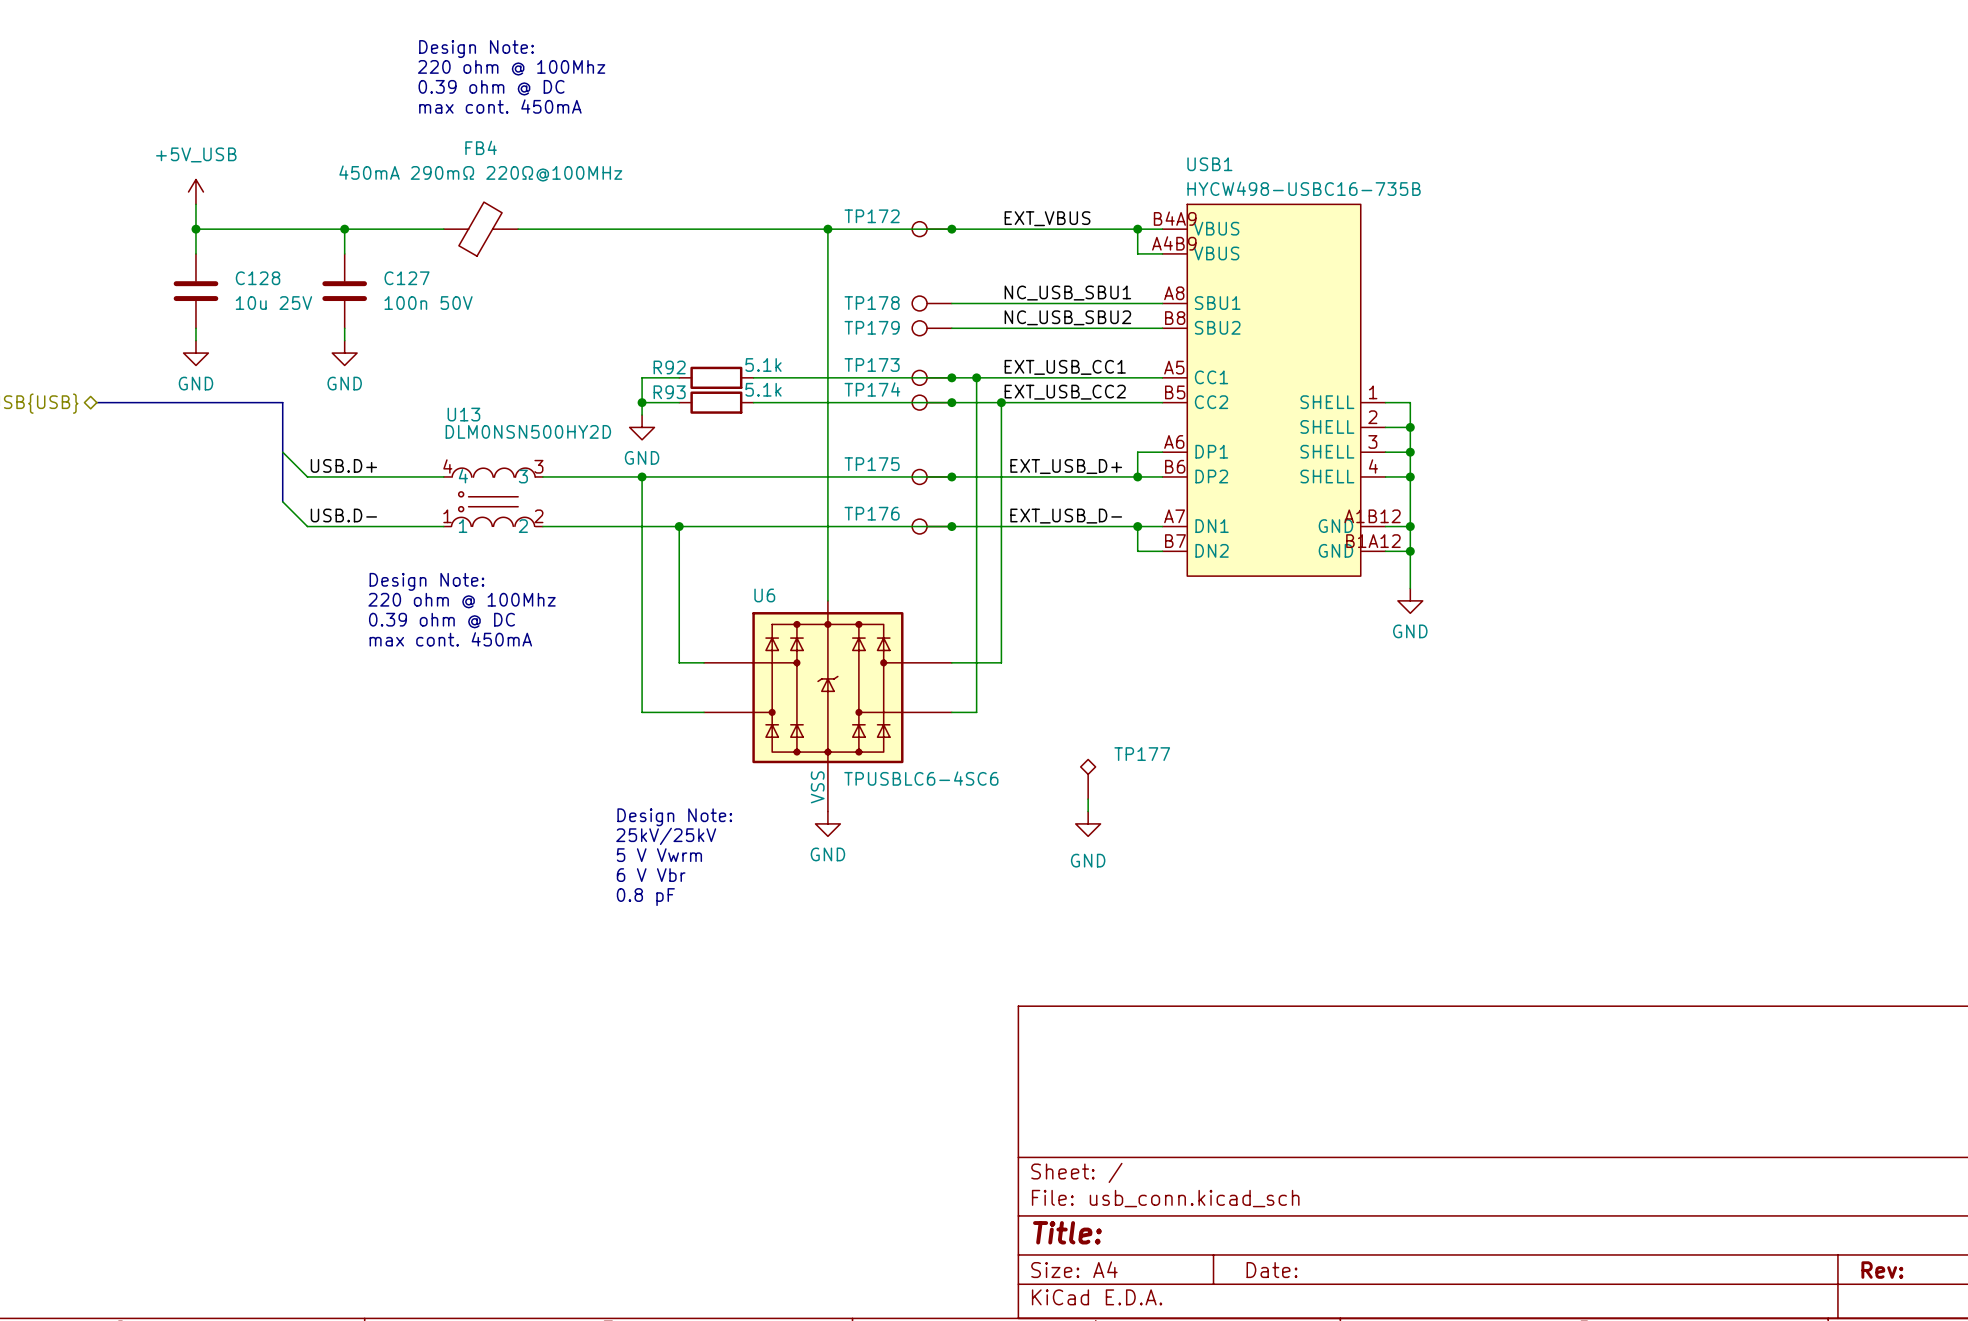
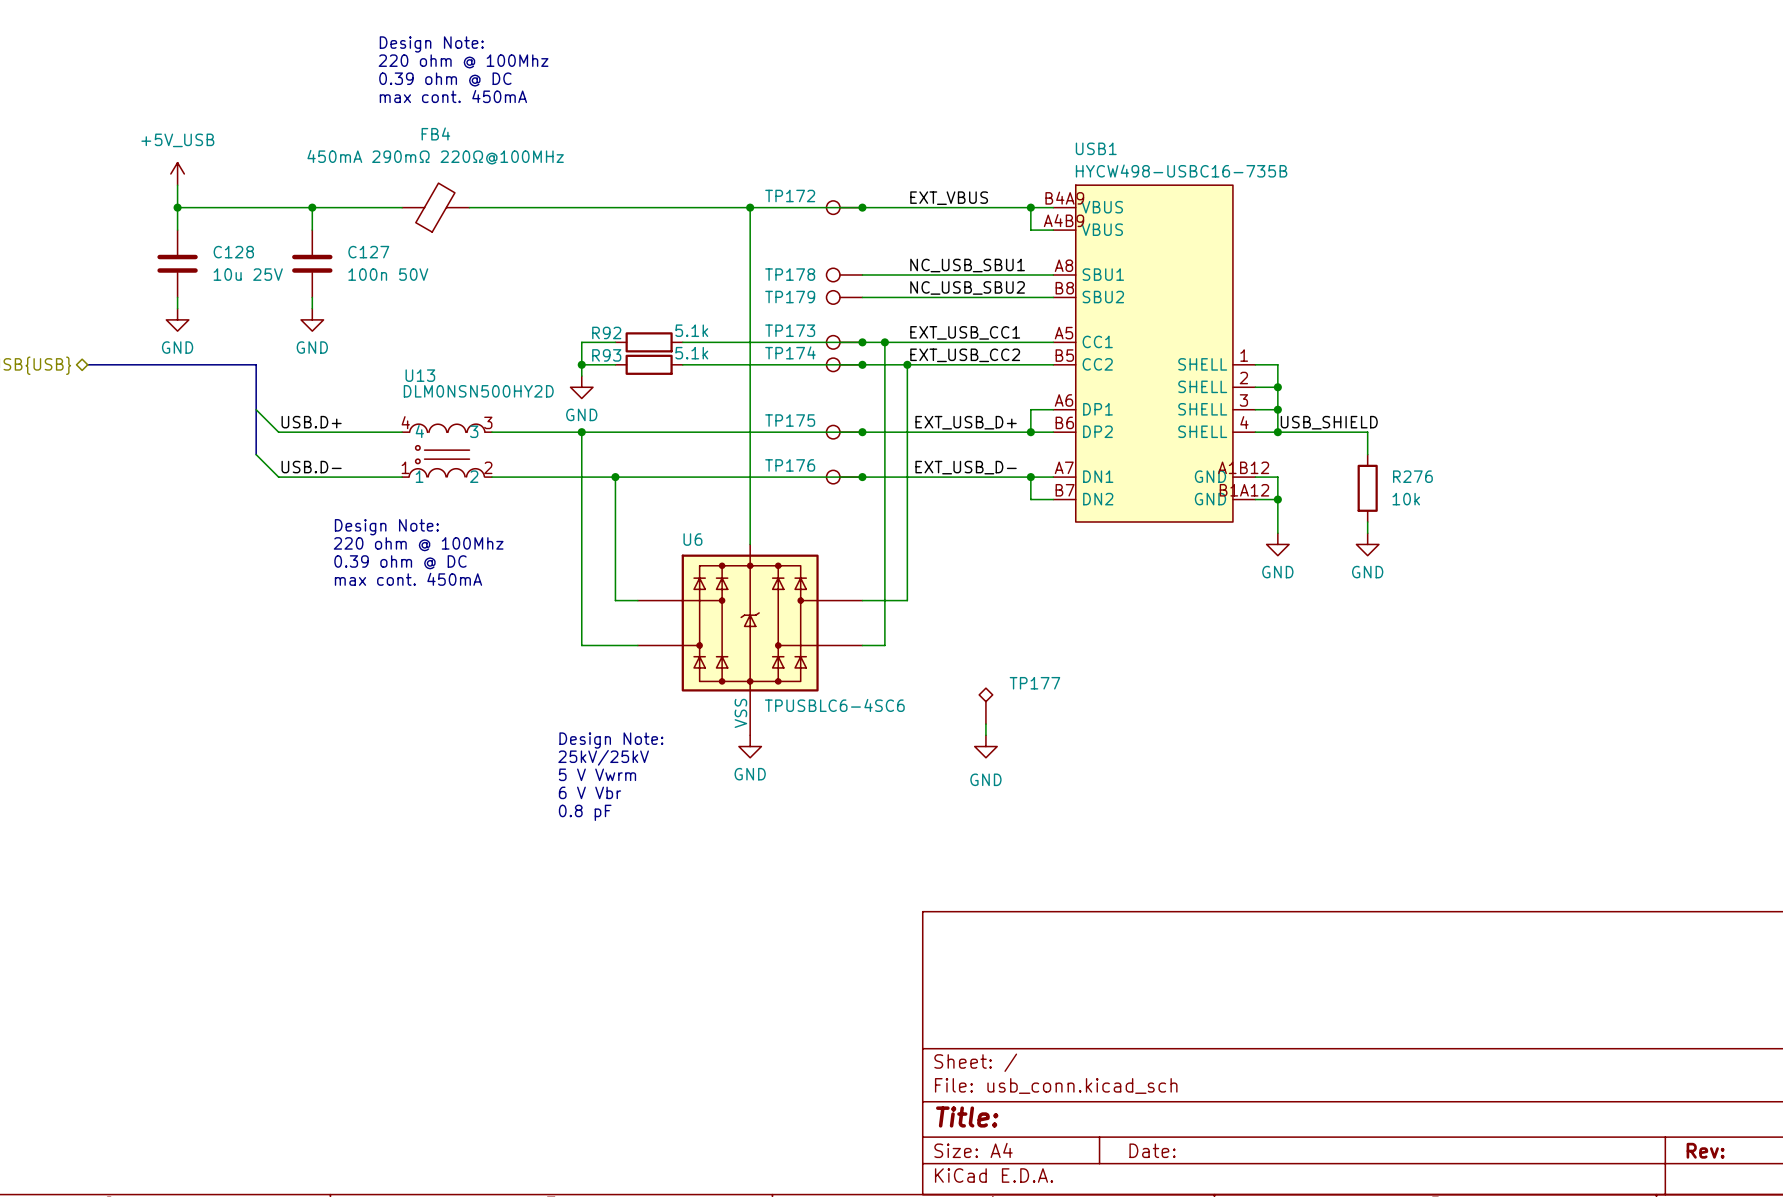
label: none -> USB_SHIELD (1329, 422)
wire: (1410, 476) (1410, 526) -> (1277, 432) (1367, 432) (1367, 454)
junction: (1410, 526) -> none
R276: none -> 10k (1367, 488)
wire: none -> (1367, 521) (1367, 533)
power symbol: none -> GND (1367, 544)

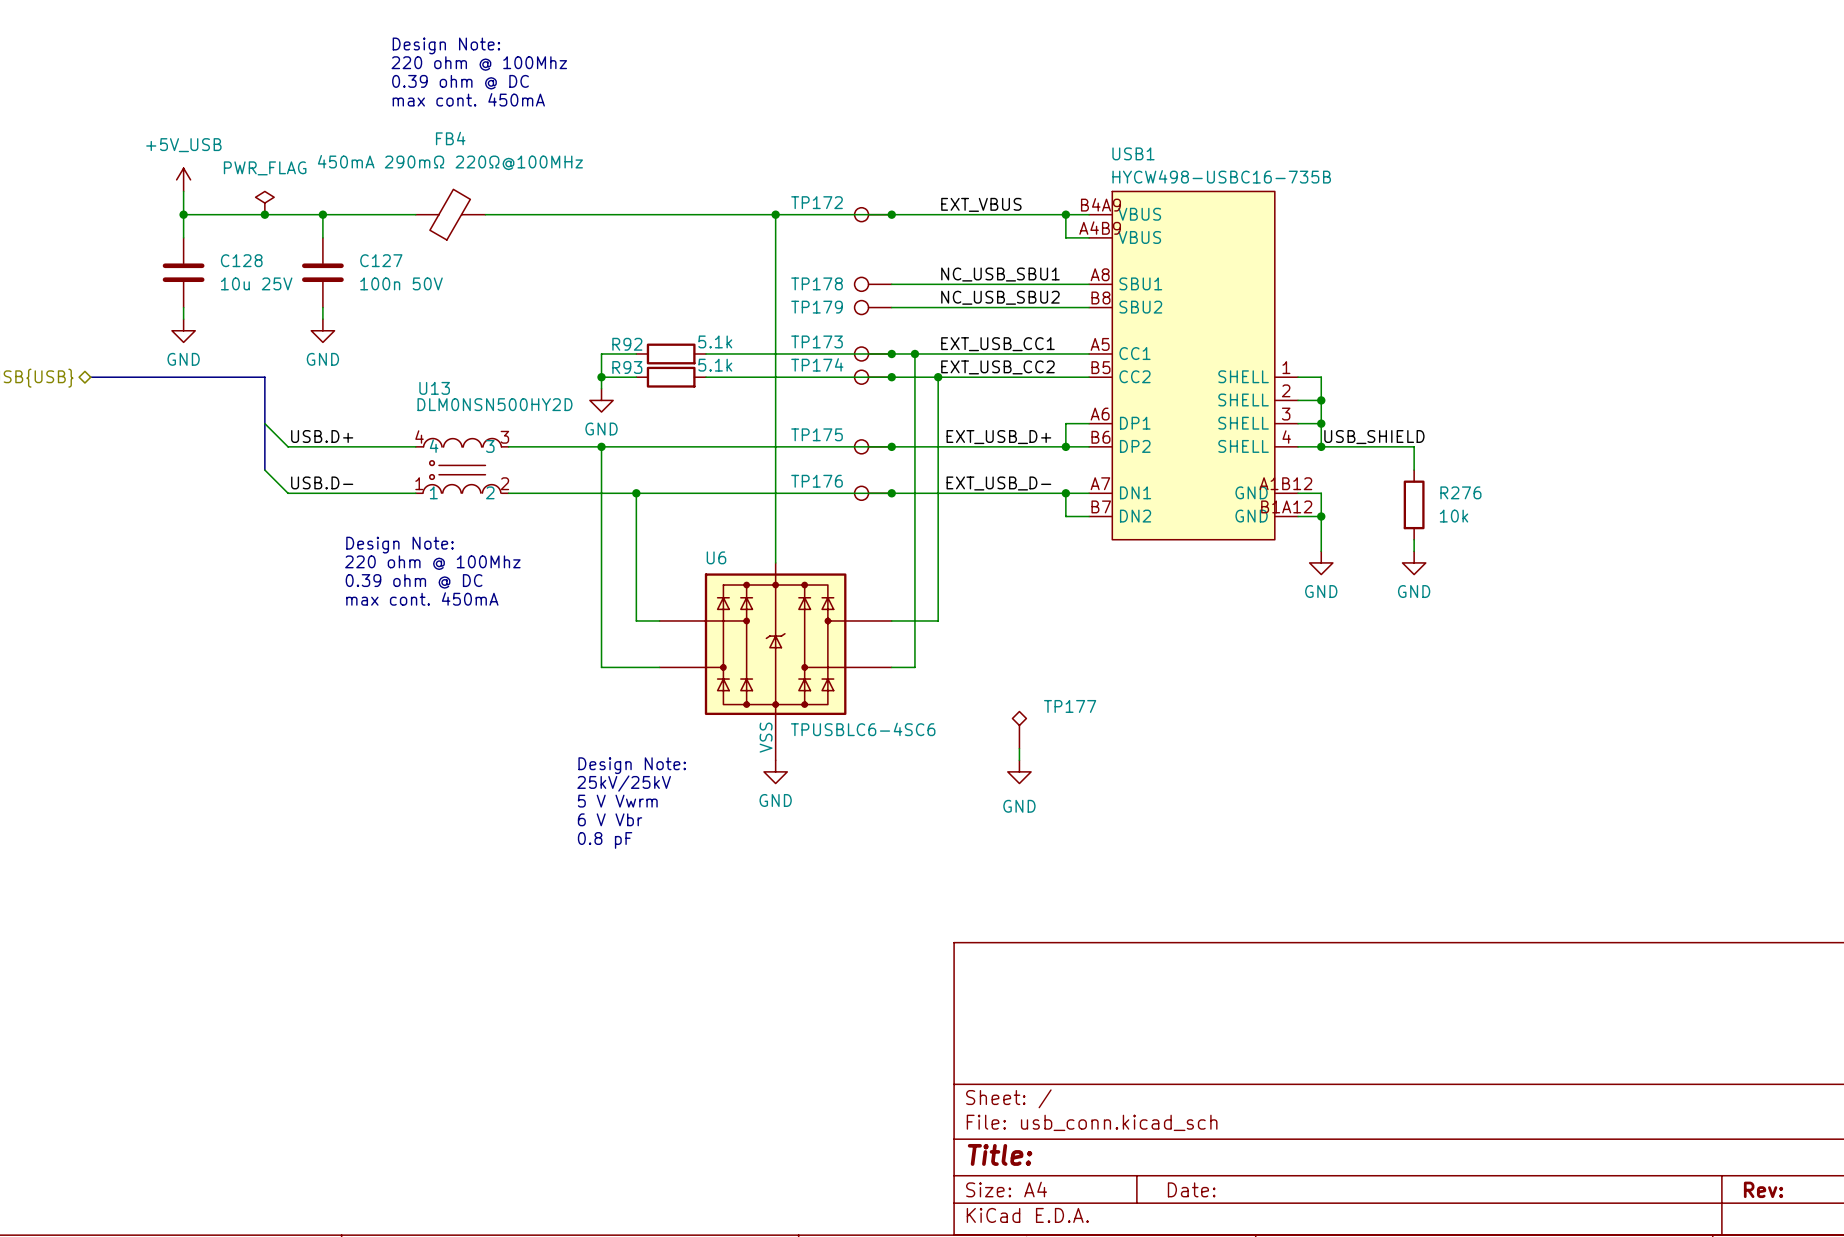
power symbol: none -> PWR_FLAG (264, 203)
junction: none -> (264, 214)

